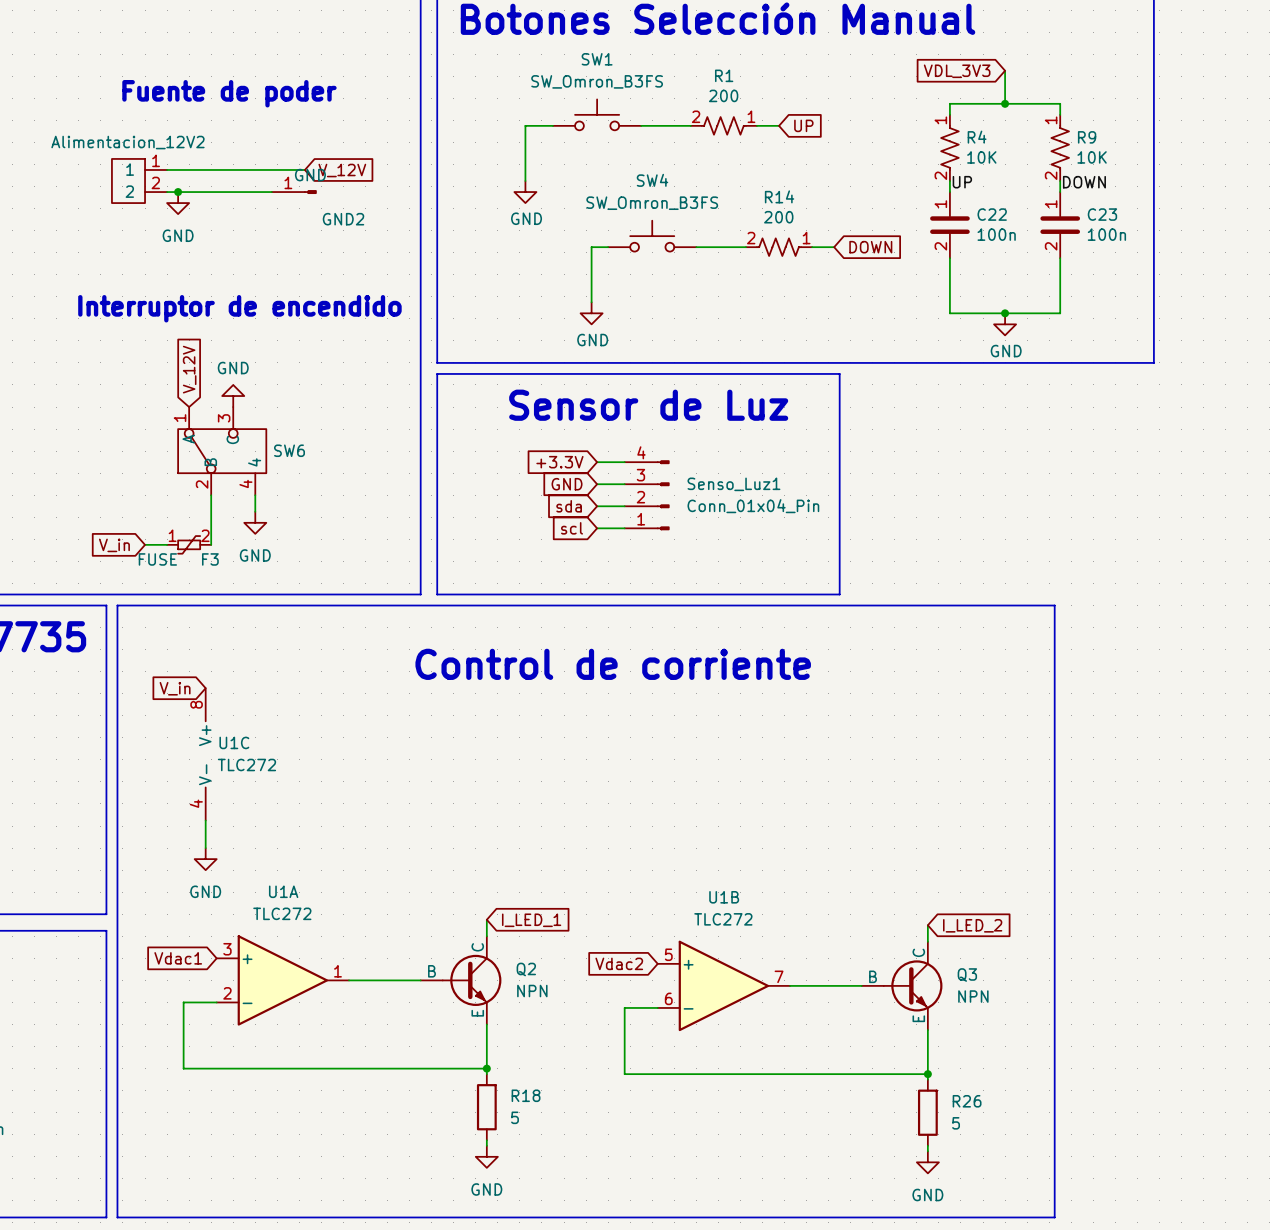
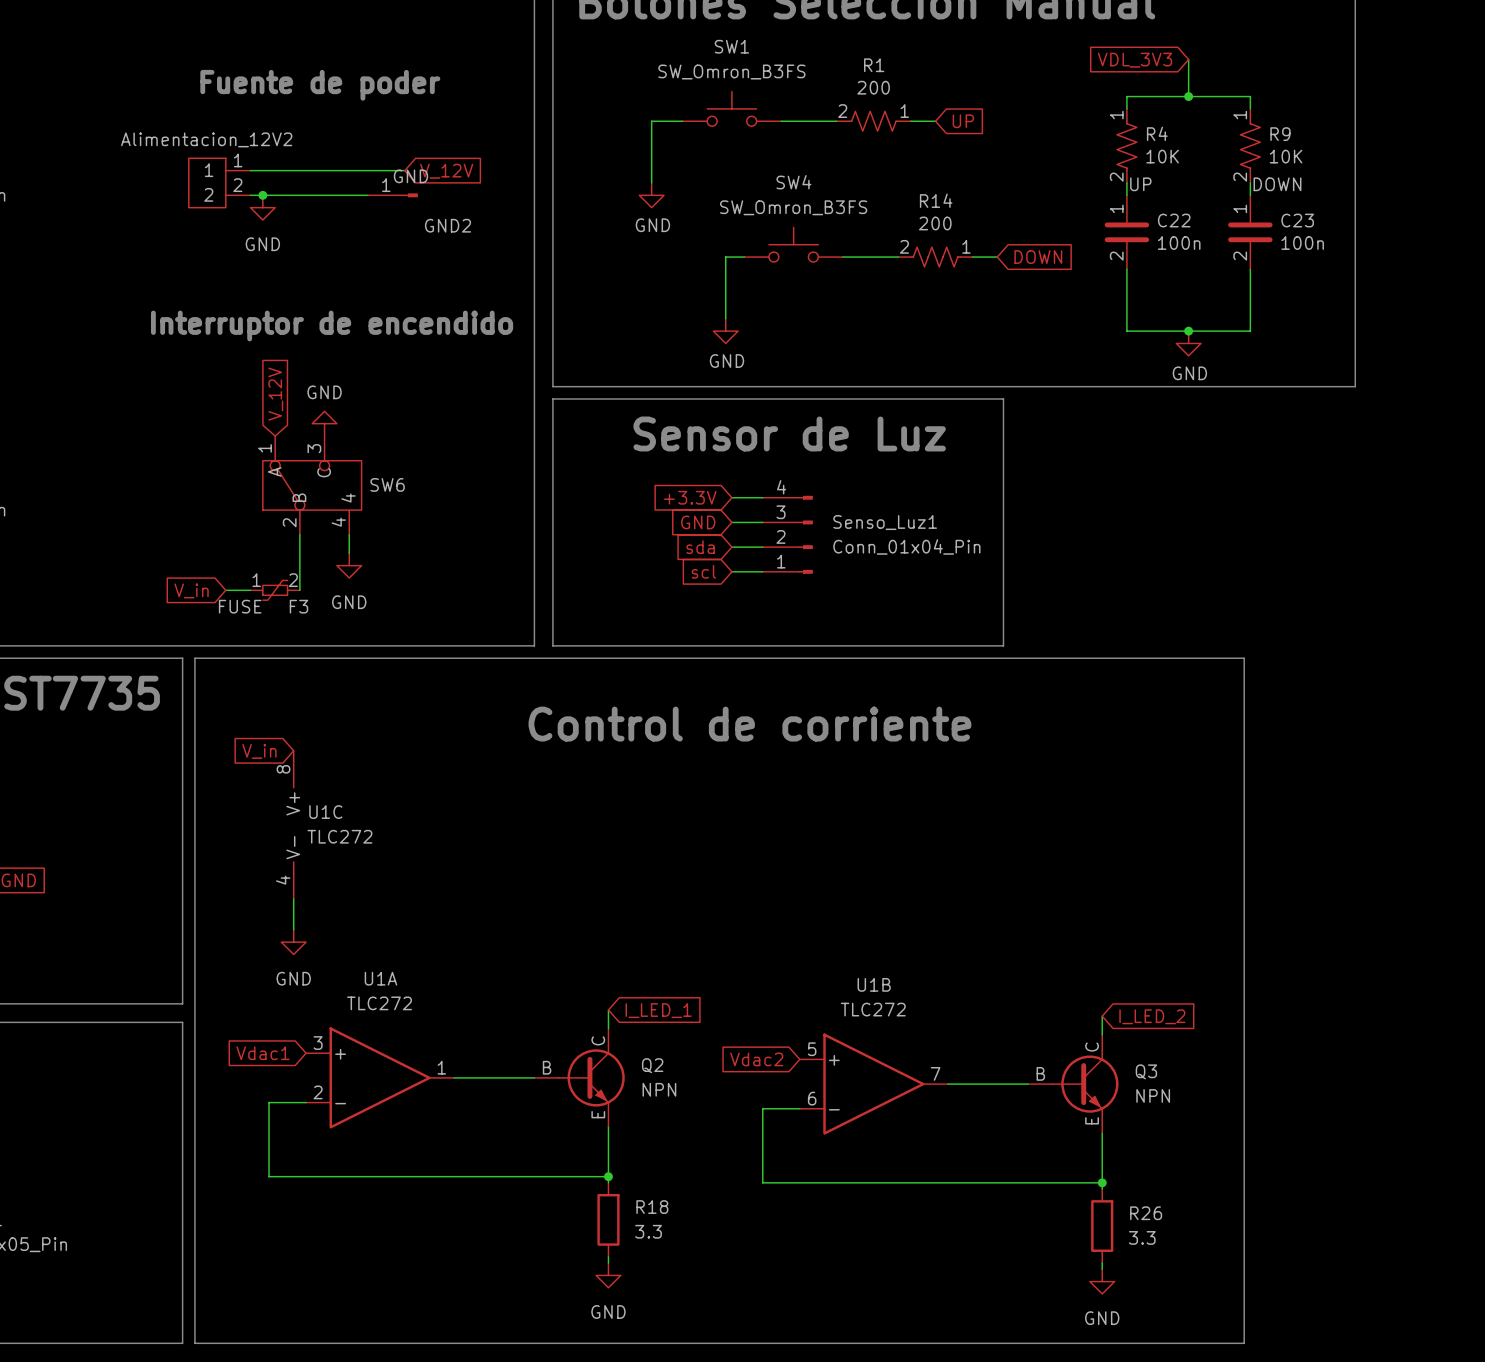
R18 value: 5 (515, 1117) -> 3.3 (648, 1231)
R26 value: 5 (956, 1123) -> 3.3 (1142, 1237)

